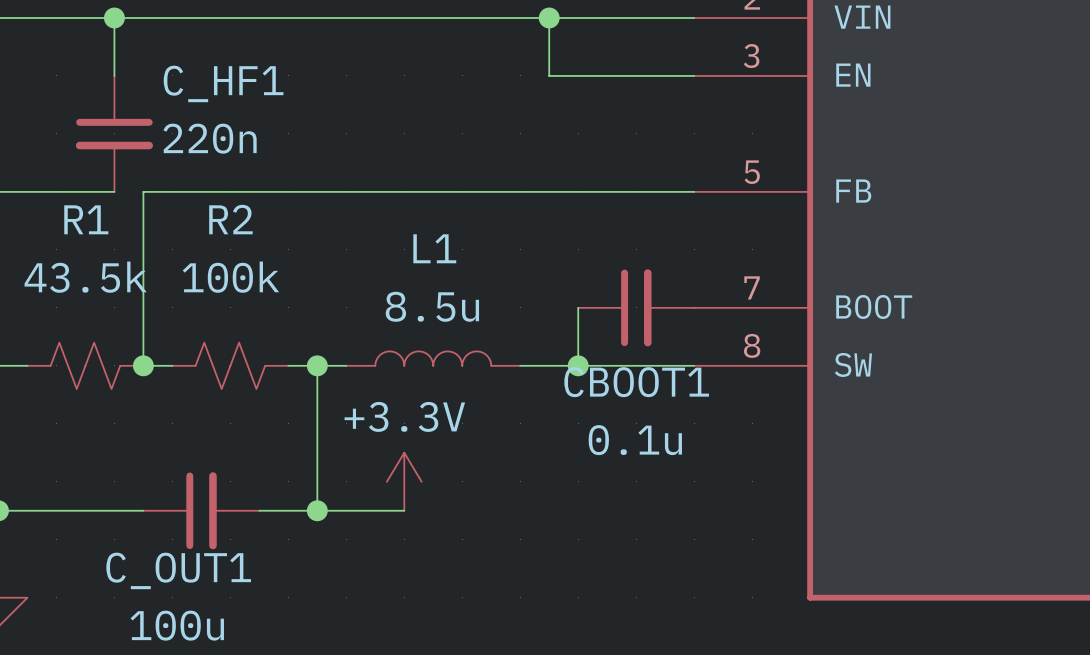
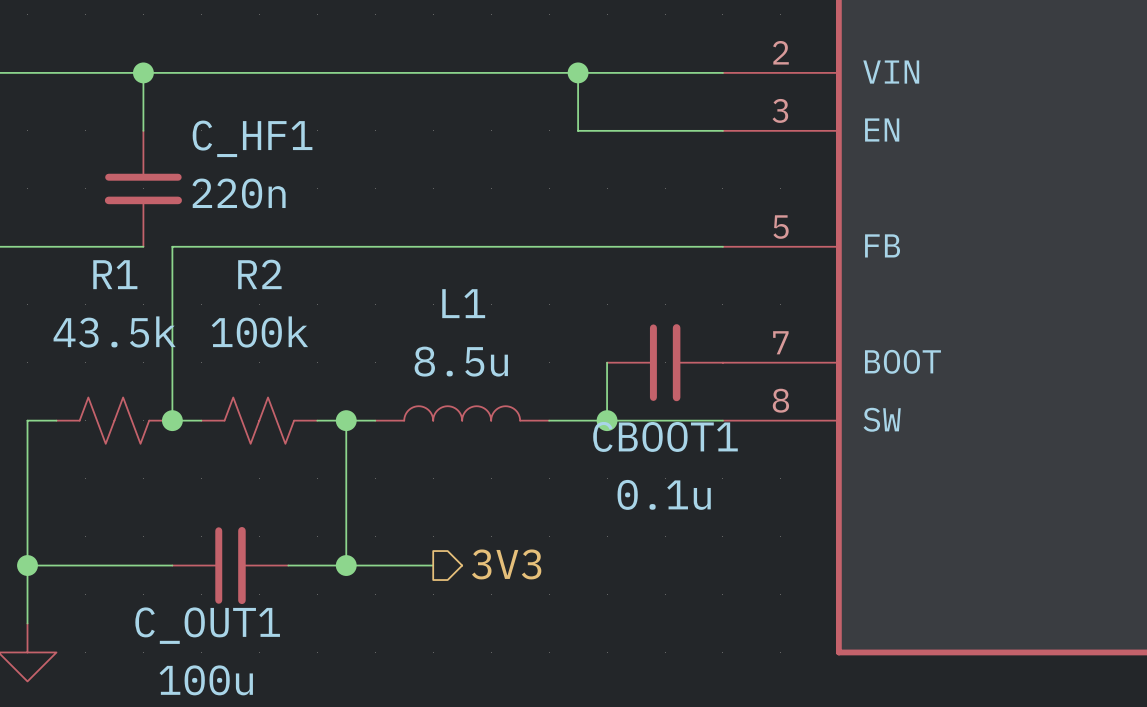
power symbol: +3.3V (404, 481) -> none
hierarchical label: none -> 3V3 (506, 564)

